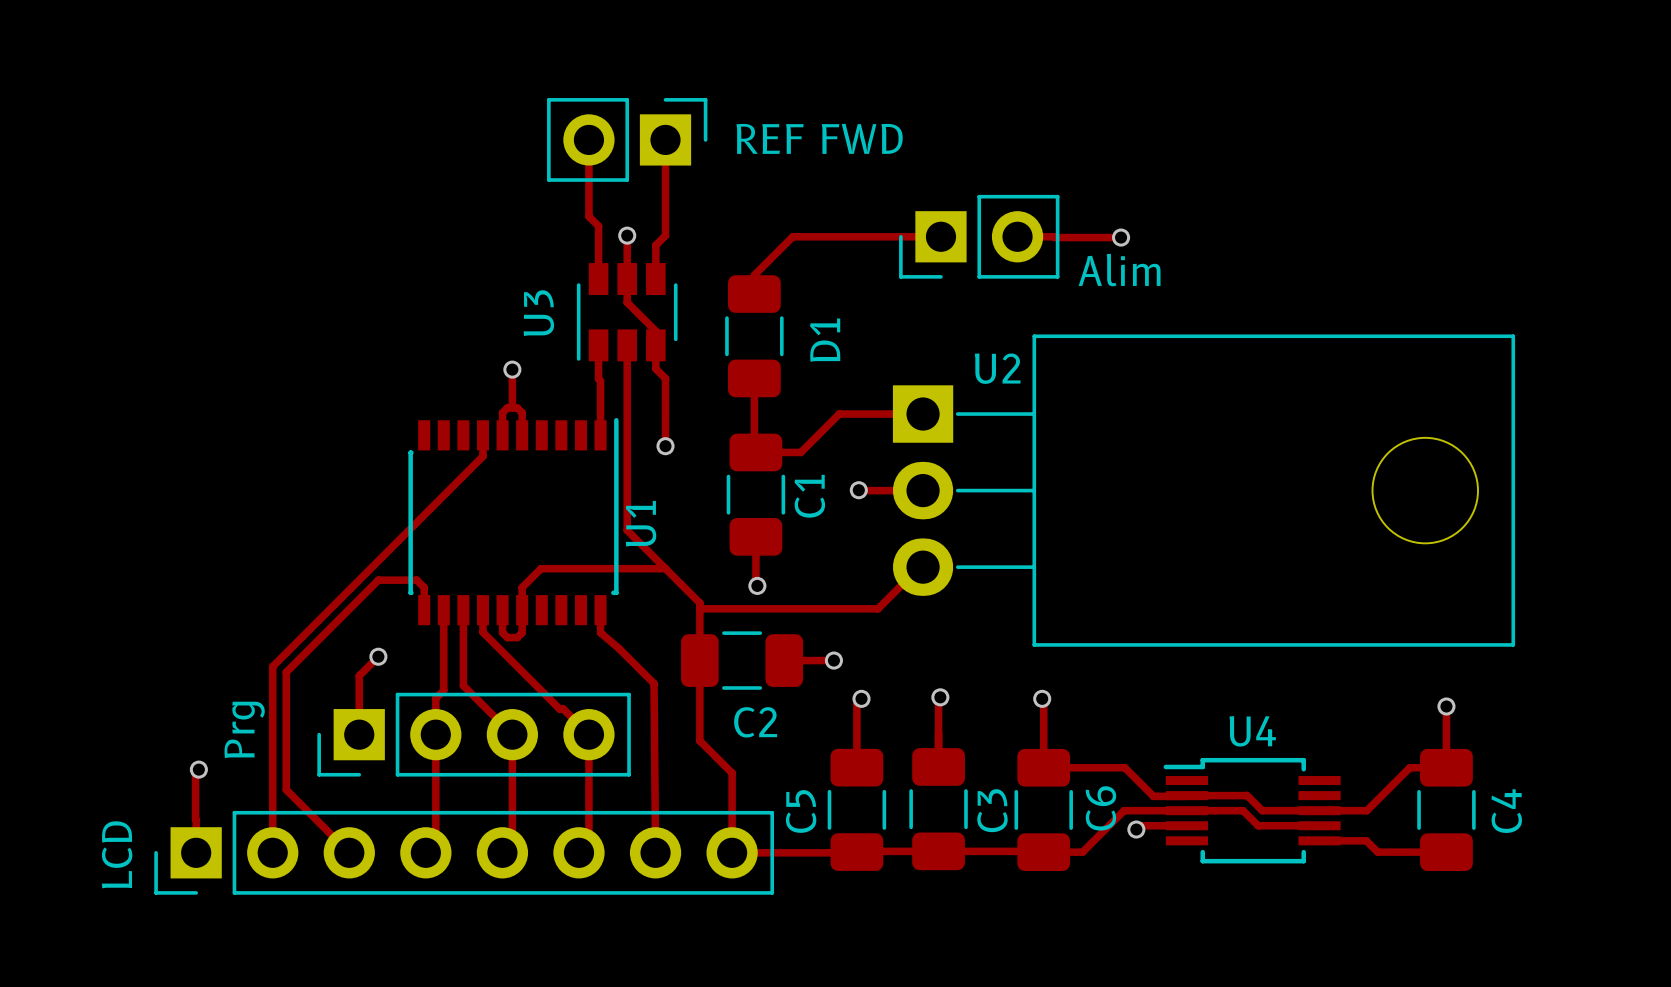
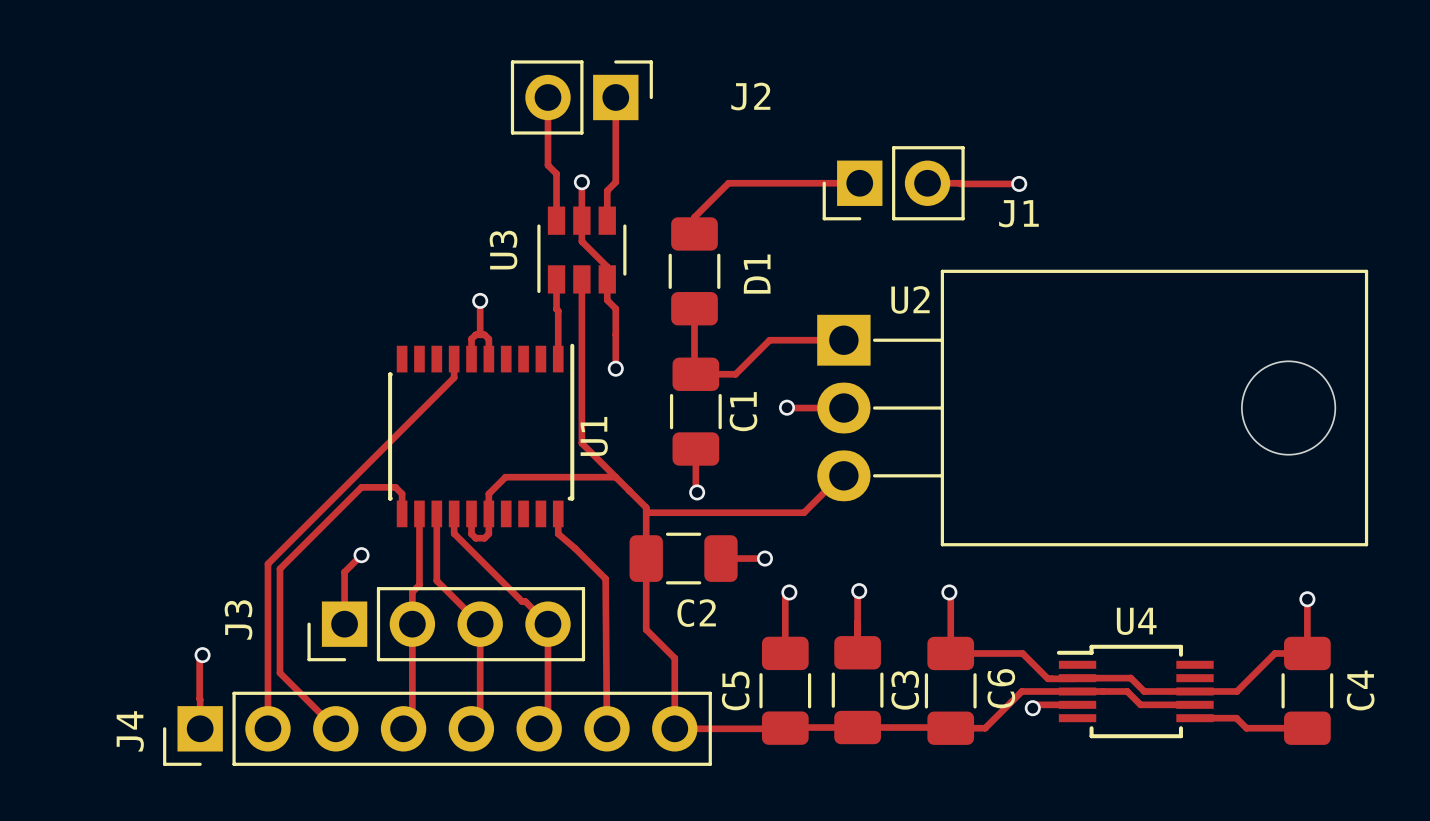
REF FWD name: REF FWD (819, 138) -> J2 (750, 96)
Alim name: Alim (1119, 270) -> J1 (1018, 213)
Prg name: Prg (244, 729) -> J3 (238, 619)
LCD name: LCD (117, 854) -> J4 (130, 731)

